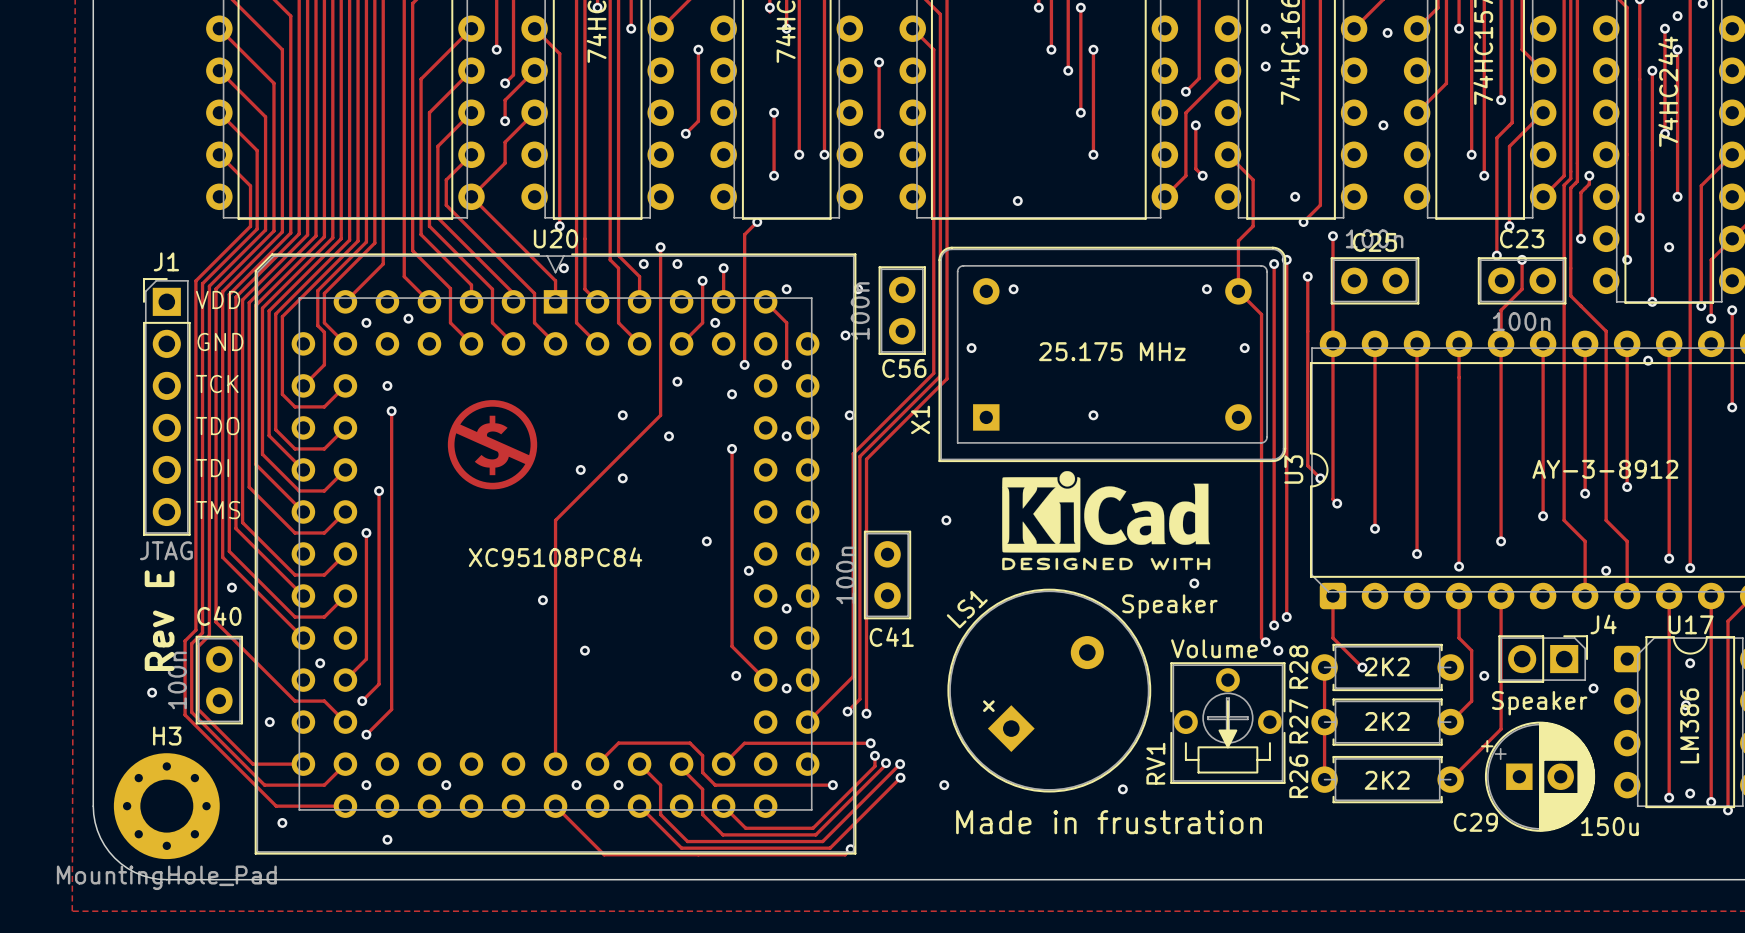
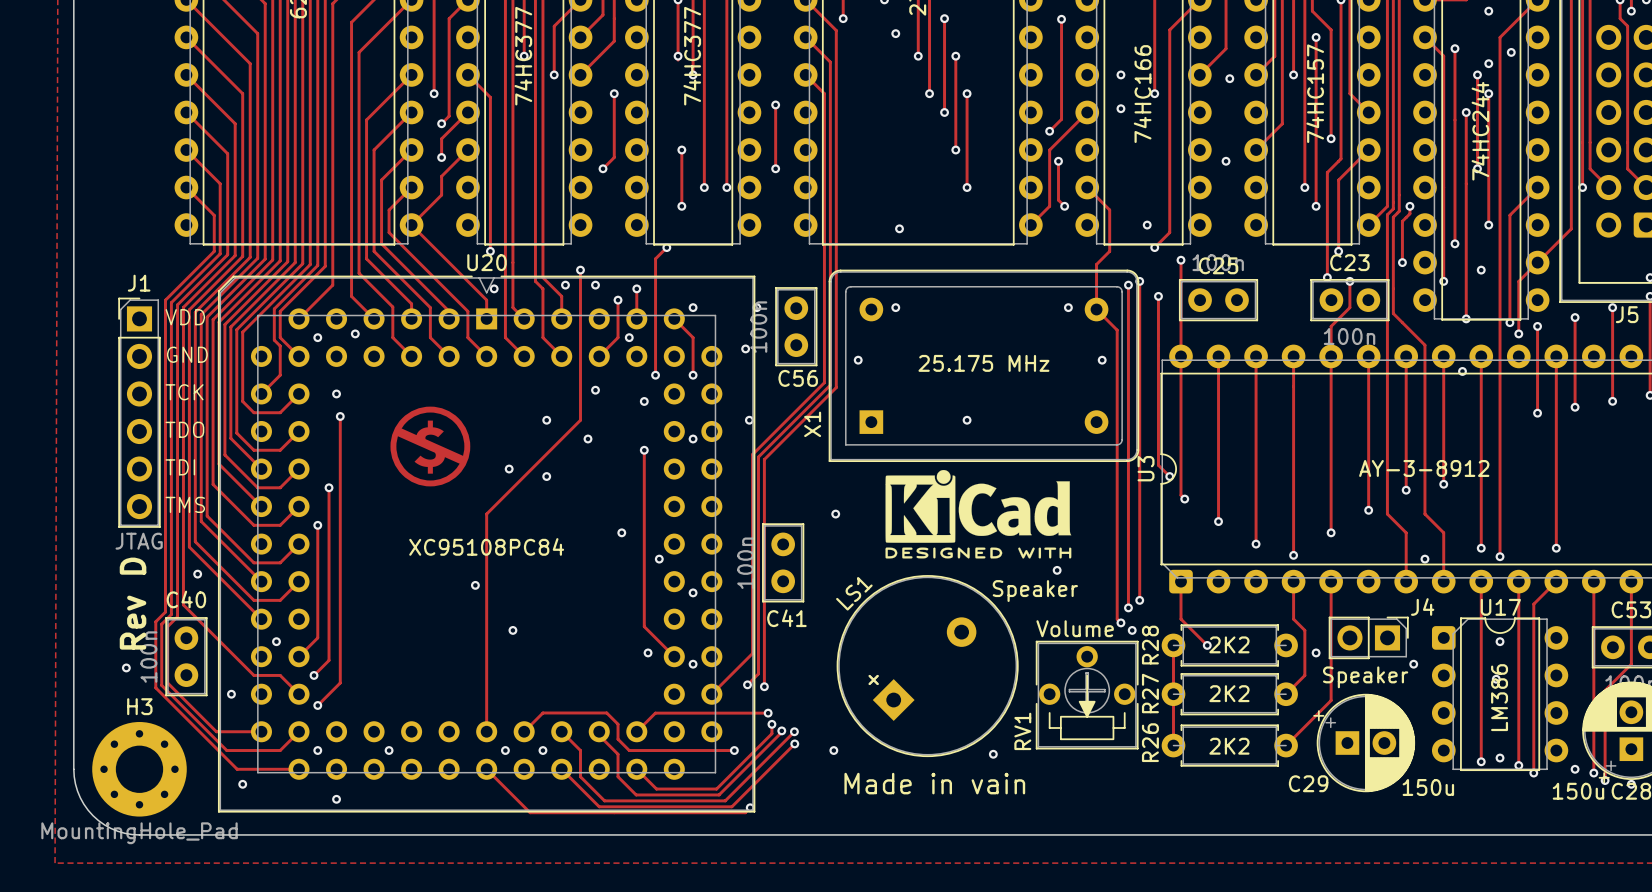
text: Rev E (159, 620) -> Rev D (133, 603)
text: Made in frustration (1109, 822) -> Made in vain (934, 783)

